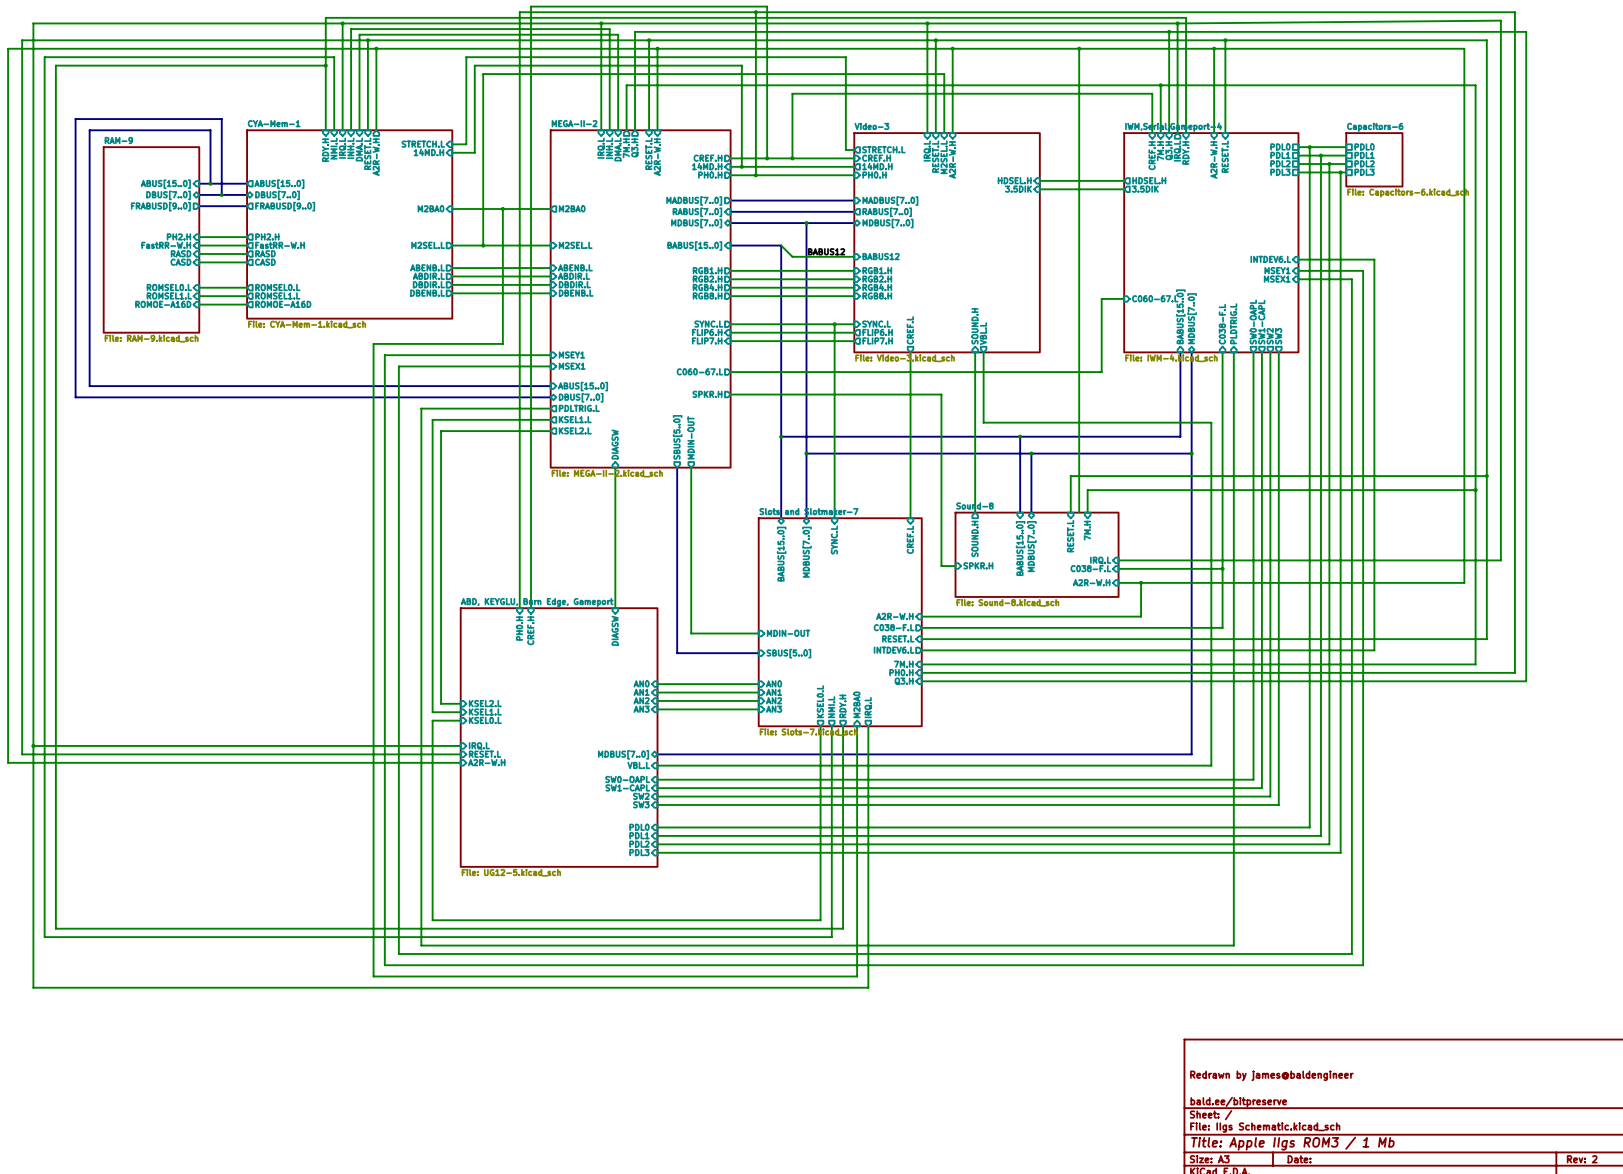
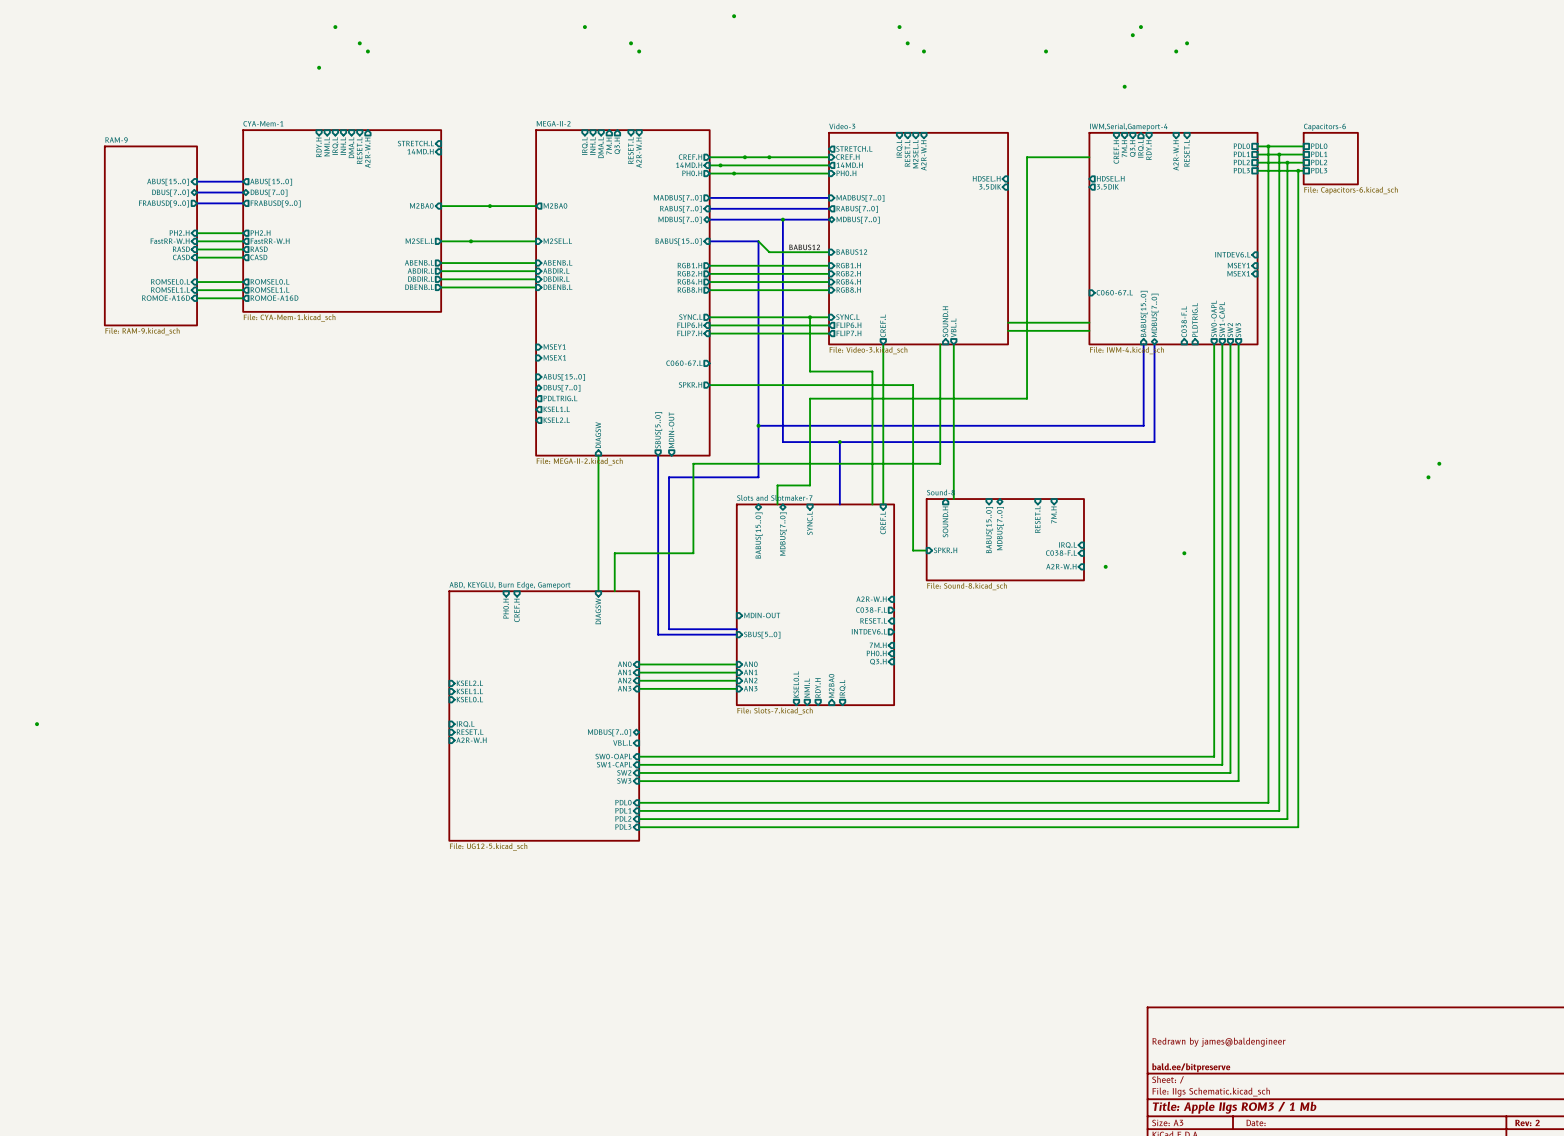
wire: (755, 12) (755, 175) -> none
wire: (342, 23) (342, 130) -> none
wire: (601, 23) (601, 130) -> none
wire: (927, 23) (927, 133) -> none
wire: (1177, 23) (33, 23) (33, 745) -> none
wire: (1177, 23) (1500, 20) (1500, 560) (1118, 560) -> none
wire: (1177, 23) (1177, 133) -> none
wire: (1169, 31) (1169, 133) -> none
wire: (367, 40) (367, 130) -> none
wire: (649, 40) (649, 130) -> none
wire: (935, 40) (935, 133) -> none
wire: (1225, 40) (1225, 133) -> none
wire: (376, 48) (376, 130) -> none
wire: (657, 48) (657, 130) -> none
wire: (952, 48) (952, 133) -> none
wire: (1079, 48) (1079, 512) -> none
wire: (1214, 48) (1214, 133) -> none
wire: (325, 65) (55, 65) (55, 928) (843, 928) (843, 726) -> none
wire: (1160, 85) (1160, 133) -> none
wire: (325, 130) (325, 17) (1186, 17) (1186, 133) -> none
wire: (334, 130) (334, 57) (44, 57) (44, 937) (831, 937) (831, 726) -> none
wire: (351, 130) (351, 29) (609, 29) (609, 130) -> none
wire: (359, 130) (359, 34) (618, 34) (618, 130) -> none
wire: (626, 130) (626, 85) (1475, 85) (1475, 664) (921, 664) -> none
wire: (635, 130) (635, 31) (1526, 31) (1526, 681) (921, 681) -> none
wire: (944, 133) (944, 74) (483, 74) (483, 245) -> none
wire: (1152, 133) (1152, 93) (792, 93) (792, 158) -> none
wire: (452, 144) (466, 144) (466, 57) (845, 57) (845, 149) (854, 149) -> none
wire: (452, 152) (474, 152) (474, 65) (741, 65) (741, 166) -> none
wire: (767, 158) (767, 6) (530, 6) (530, 608) -> none
wire: none -> (1089, 157) (1027, 157) (1027, 398) (810, 398)
wire: (1039, 180) (1124, 180) -> none
bus: (210, 183) (210, 130) (89, 130) (89, 386) (550, 386) -> none
junction: (210, 183) -> none
wire: (1039, 189) (1124, 189) -> none
bus: (221, 194) (221, 119) (75, 119) (75, 397) (550, 397) -> none
junction: (221, 194) -> none
wire: (502, 209) (502, 343) (373, 343) (373, 976) (857, 976) (857, 726) -> none
wire: (1298, 259) (1374, 259) (1374, 650) (921, 650) -> none
wire: (1298, 270) (1363, 270) (1363, 965) (384, 965) (384, 355) (550, 355) -> none
wire: (1298, 279) (1351, 279) (1351, 953) (398, 953) (398, 366) (550, 366) -> none
wire: (1124, 298) (1101, 298) (1101, 372) (730, 372) -> none
wire: none -> (1008, 322) (1089, 322)
wire: none -> (1008, 330) (1089, 330)
wire: none -> (940, 344) (940, 463) (693, 463) (693, 553) (614, 553) (614, 591)
wire: (975, 352) (975, 512) -> none
wire: (1222, 352) (1222, 627) (921, 627) -> none
wire: (1233, 352) (1233, 945) (421, 945) (421, 408) (550, 408) -> none
wire: (834, 380) (834, 408) -> (810, 371) (872, 371) (872, 504)
wire: (550, 419) (432, 419) (432, 712) (460, 712) -> none
wire: (983, 422) (1211, 422) (1211, 765) (657, 765) -> (953, 412) (953, 499)
wire: (550, 431) (441, 431) (441, 703) (460, 703) -> none
bus: (1020, 436) (1020, 512) -> none
junction: (1020, 436) -> none
bus: (806, 453) (806, 518) -> (839, 442) (839, 504)
junction: (806, 453) -> none
junction: none -> (839, 442)
bus: (1031, 453) (1031, 512) -> none
junction: (1031, 453) -> none
bus: (1191, 453) (1191, 754) (657, 754) -> none
junction: (1191, 453) -> none
wire: (691, 467) (691, 633) (758, 633) -> none
wire: (1486, 476) (1070, 476) (1070, 512) -> none
bus: (781, 490) (781, 518) -> (758, 477) (668, 477) (668, 629) (736, 629)
wire: (1475, 490) (1087, 490) (1087, 512) -> none
wire: (834, 498) (834, 518) -> (810, 485) (777, 485) (777, 504)
wire: (1118, 568) (1222, 568) -> none
wire: (1118, 582) (1464, 582) (1464, 48) (8, 48) (8, 762) (460, 762) -> none
wire: (1141, 582) (1141, 616) (921, 616) -> none
wire: (519, 608) (519, 12) (1514, 12) (1514, 672) (921, 672) -> none
wire: (921, 639) (1486, 639) (1486, 40) (22, 40) (22, 754) (460, 754) -> none
wire: (460, 720) (432, 720) (432, 920) (820, 920) (820, 726) -> none
wire: (868, 726) (868, 987) (33, 987) (33, 745) -> none
wire: (33, 745) (460, 745) -> none

